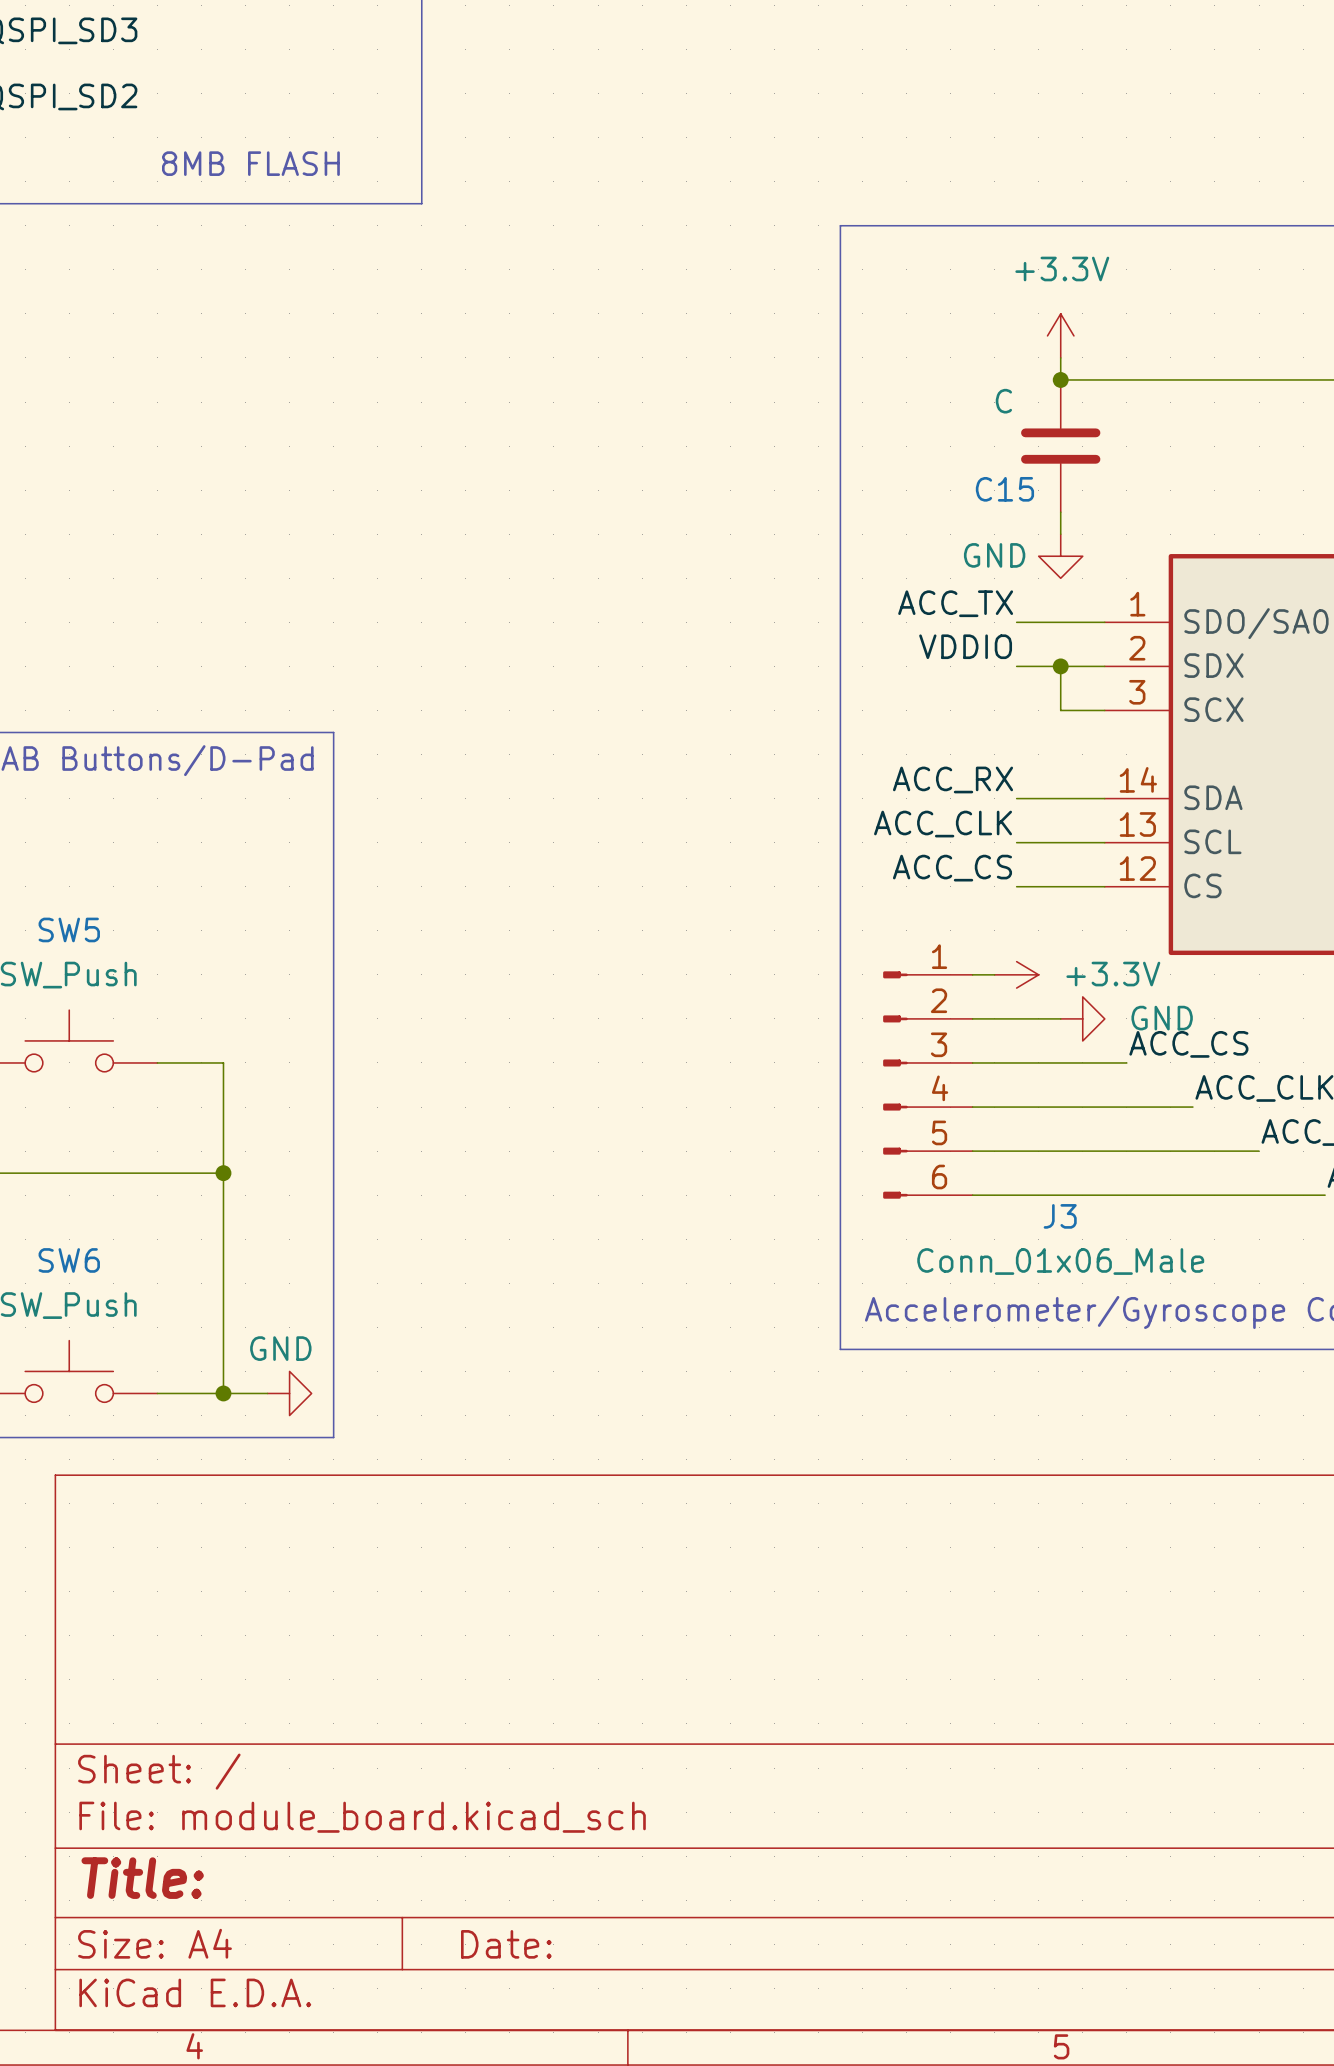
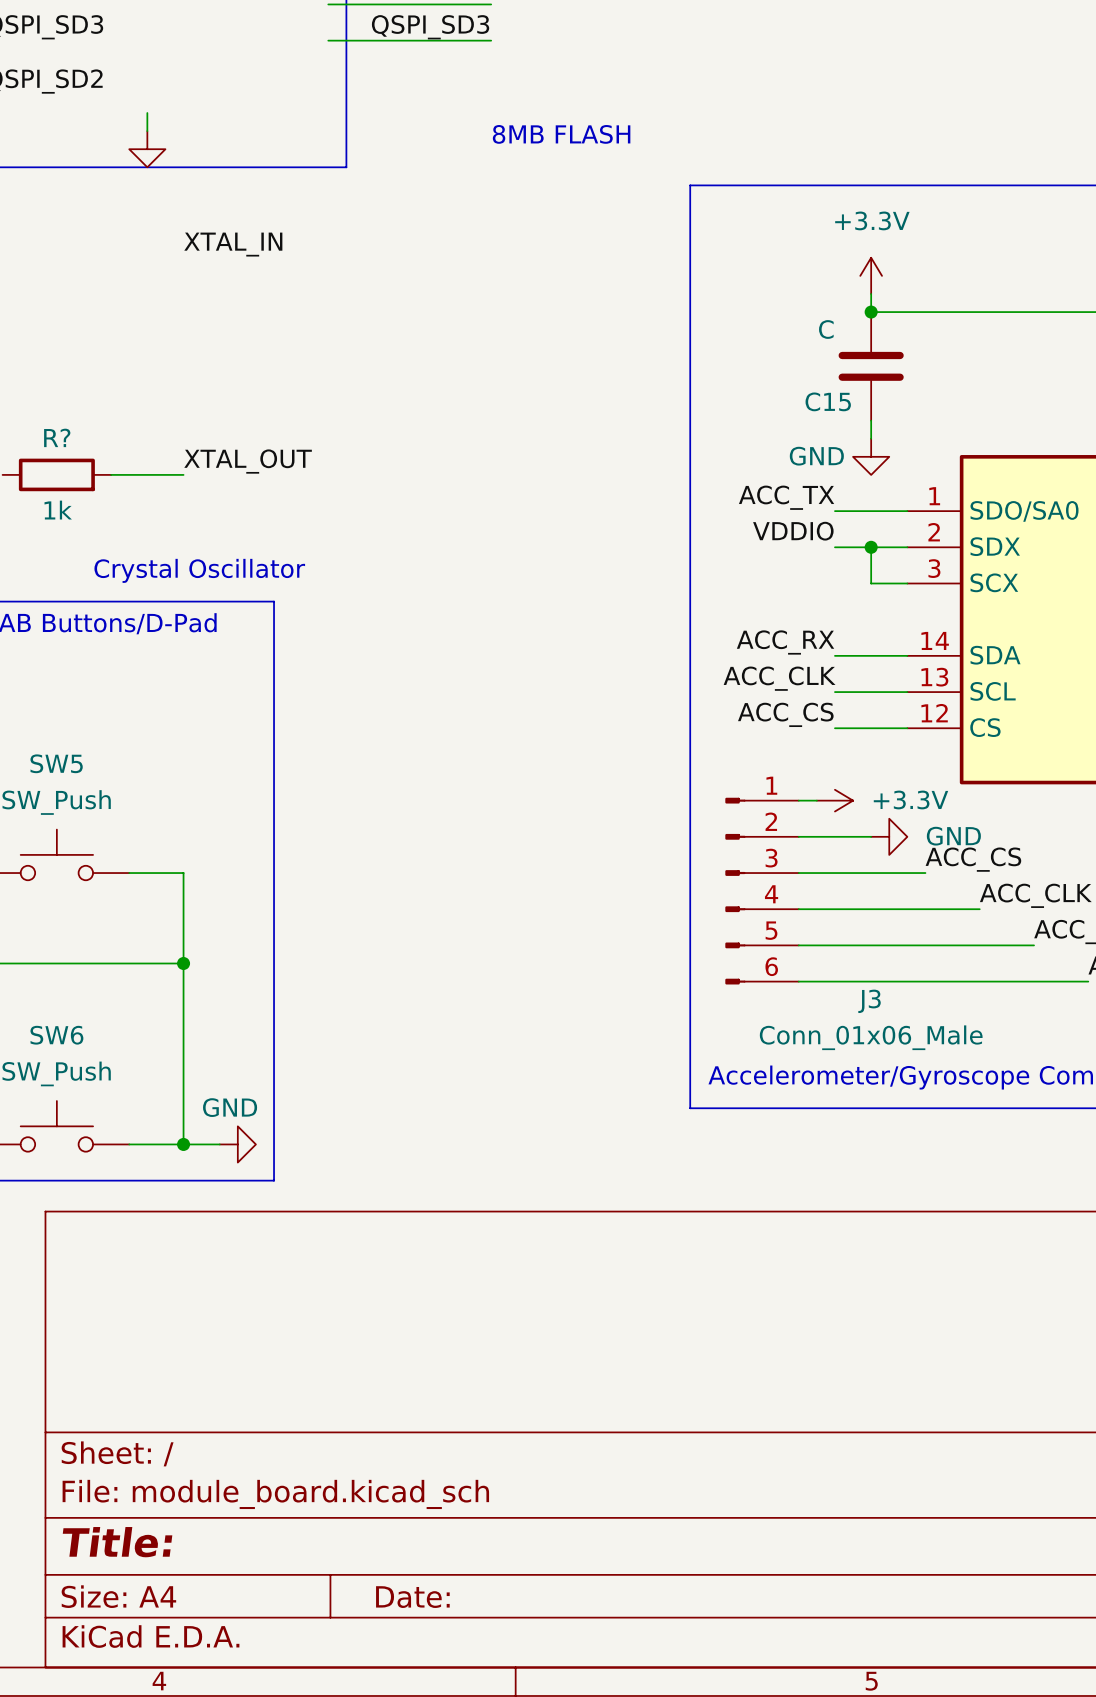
wire: none -> (328, 4) (491, 4)
label: none -> QSPI_SD3 (430, 27)
wire: none -> (328, 40) (491, 40)
wire: none -> (147, 113) (147, 131)
text: 8MB FLASH (250, 163) -> none
text: none -> 8MB FLASH (561, 134)
power symbol: none -> (147, 149)
label: none -> XTAL_IN (233, 244)
label: none -> XTAL_OUT (248, 461)
R?: none -> 1k (56, 474)
wire: none -> (111, 474) (183, 474)
text: none -> Crystal Oscillator (199, 570)

